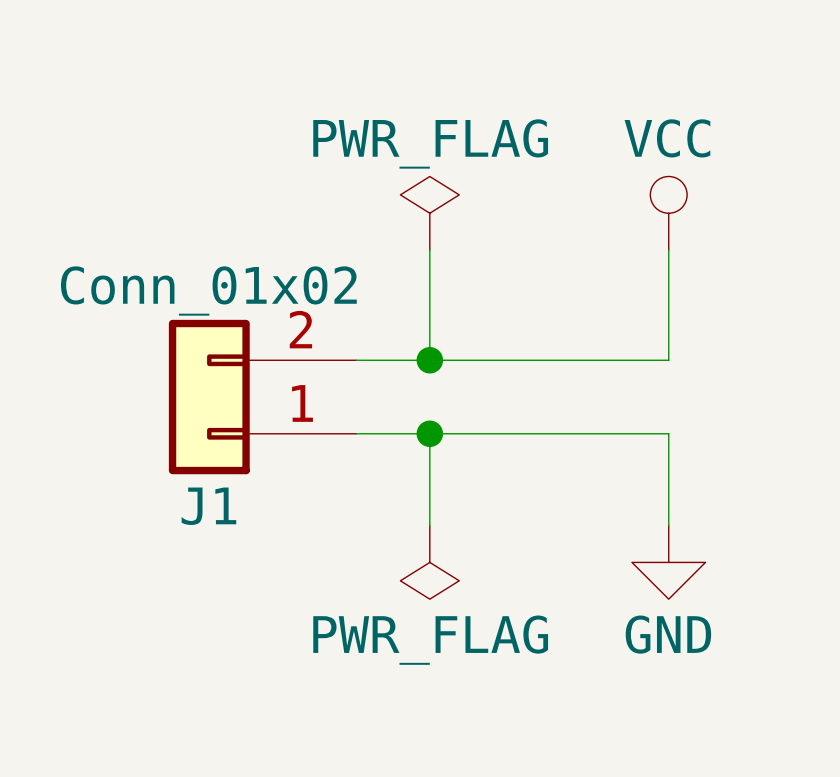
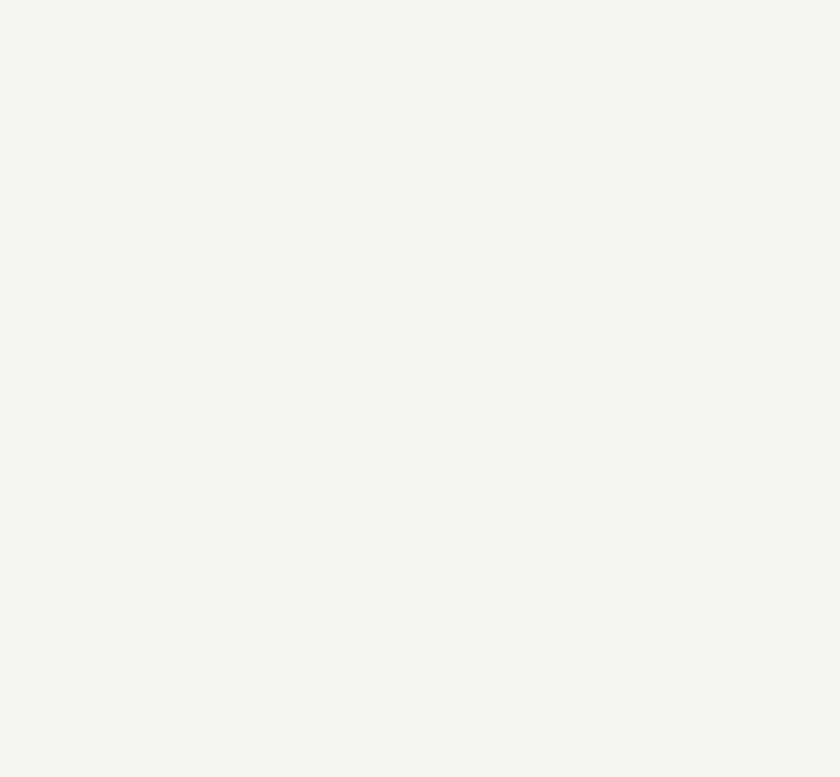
power symbol: PWR_FLAG (429, 213) -> none
power symbol: VCC (668, 213) -> none
wire: (429, 250) (429, 360) -> none
wire: (668, 250) (668, 360) (356, 360) -> none
junction: (429, 360) -> none
J1: Conn_01x02 (262, 397) -> none
wire: (356, 433) (668, 433) (668, 525) -> none
wire: (429, 433) (429, 525) -> none
junction: (429, 433) -> none
power symbol: PWR_FLAG (429, 562) -> none
power symbol: GND (668, 562) -> none

